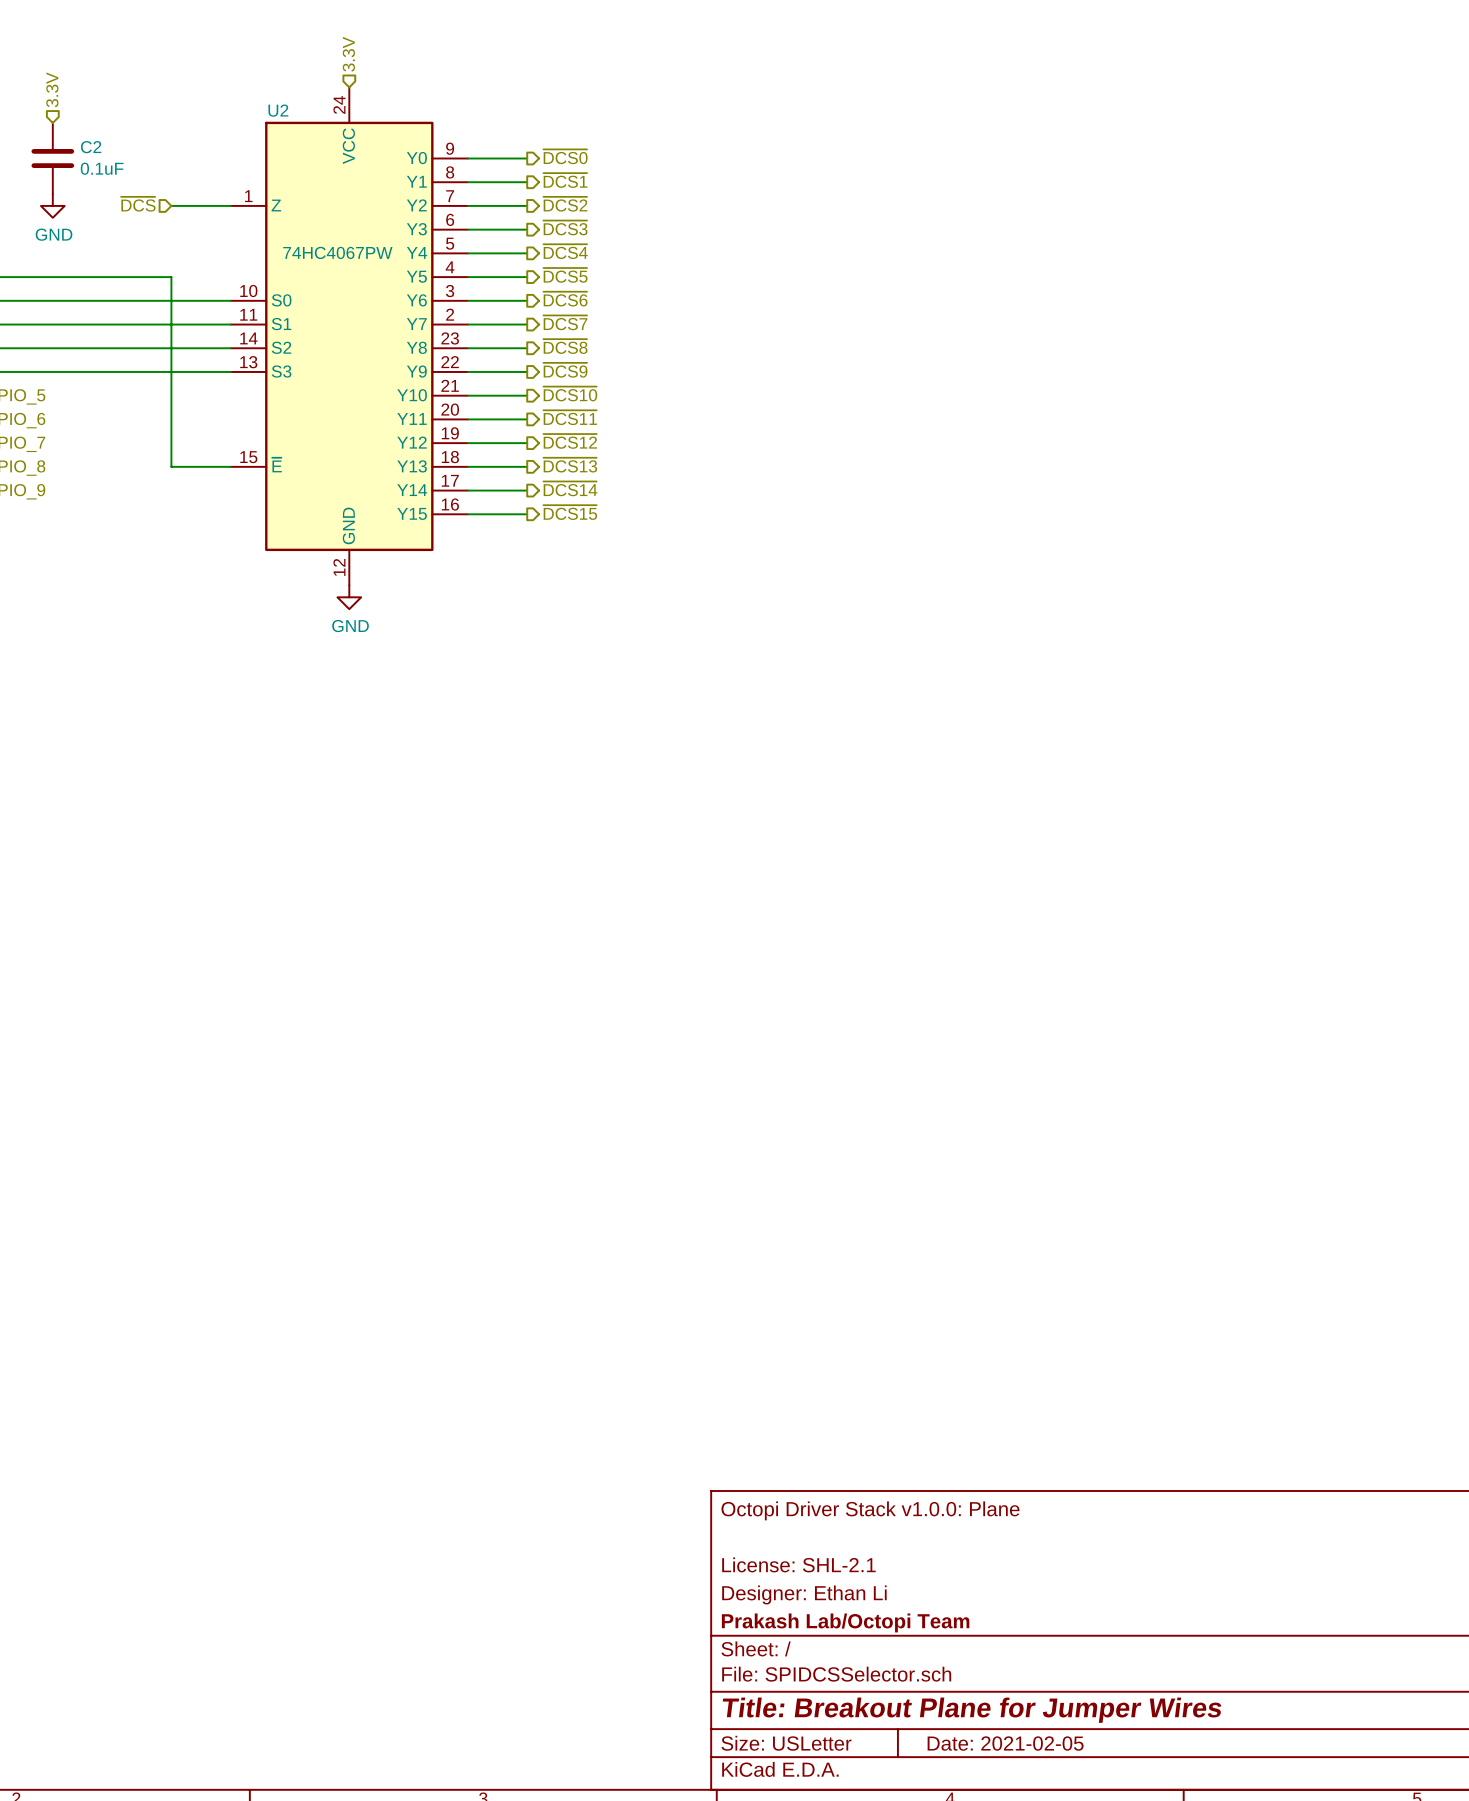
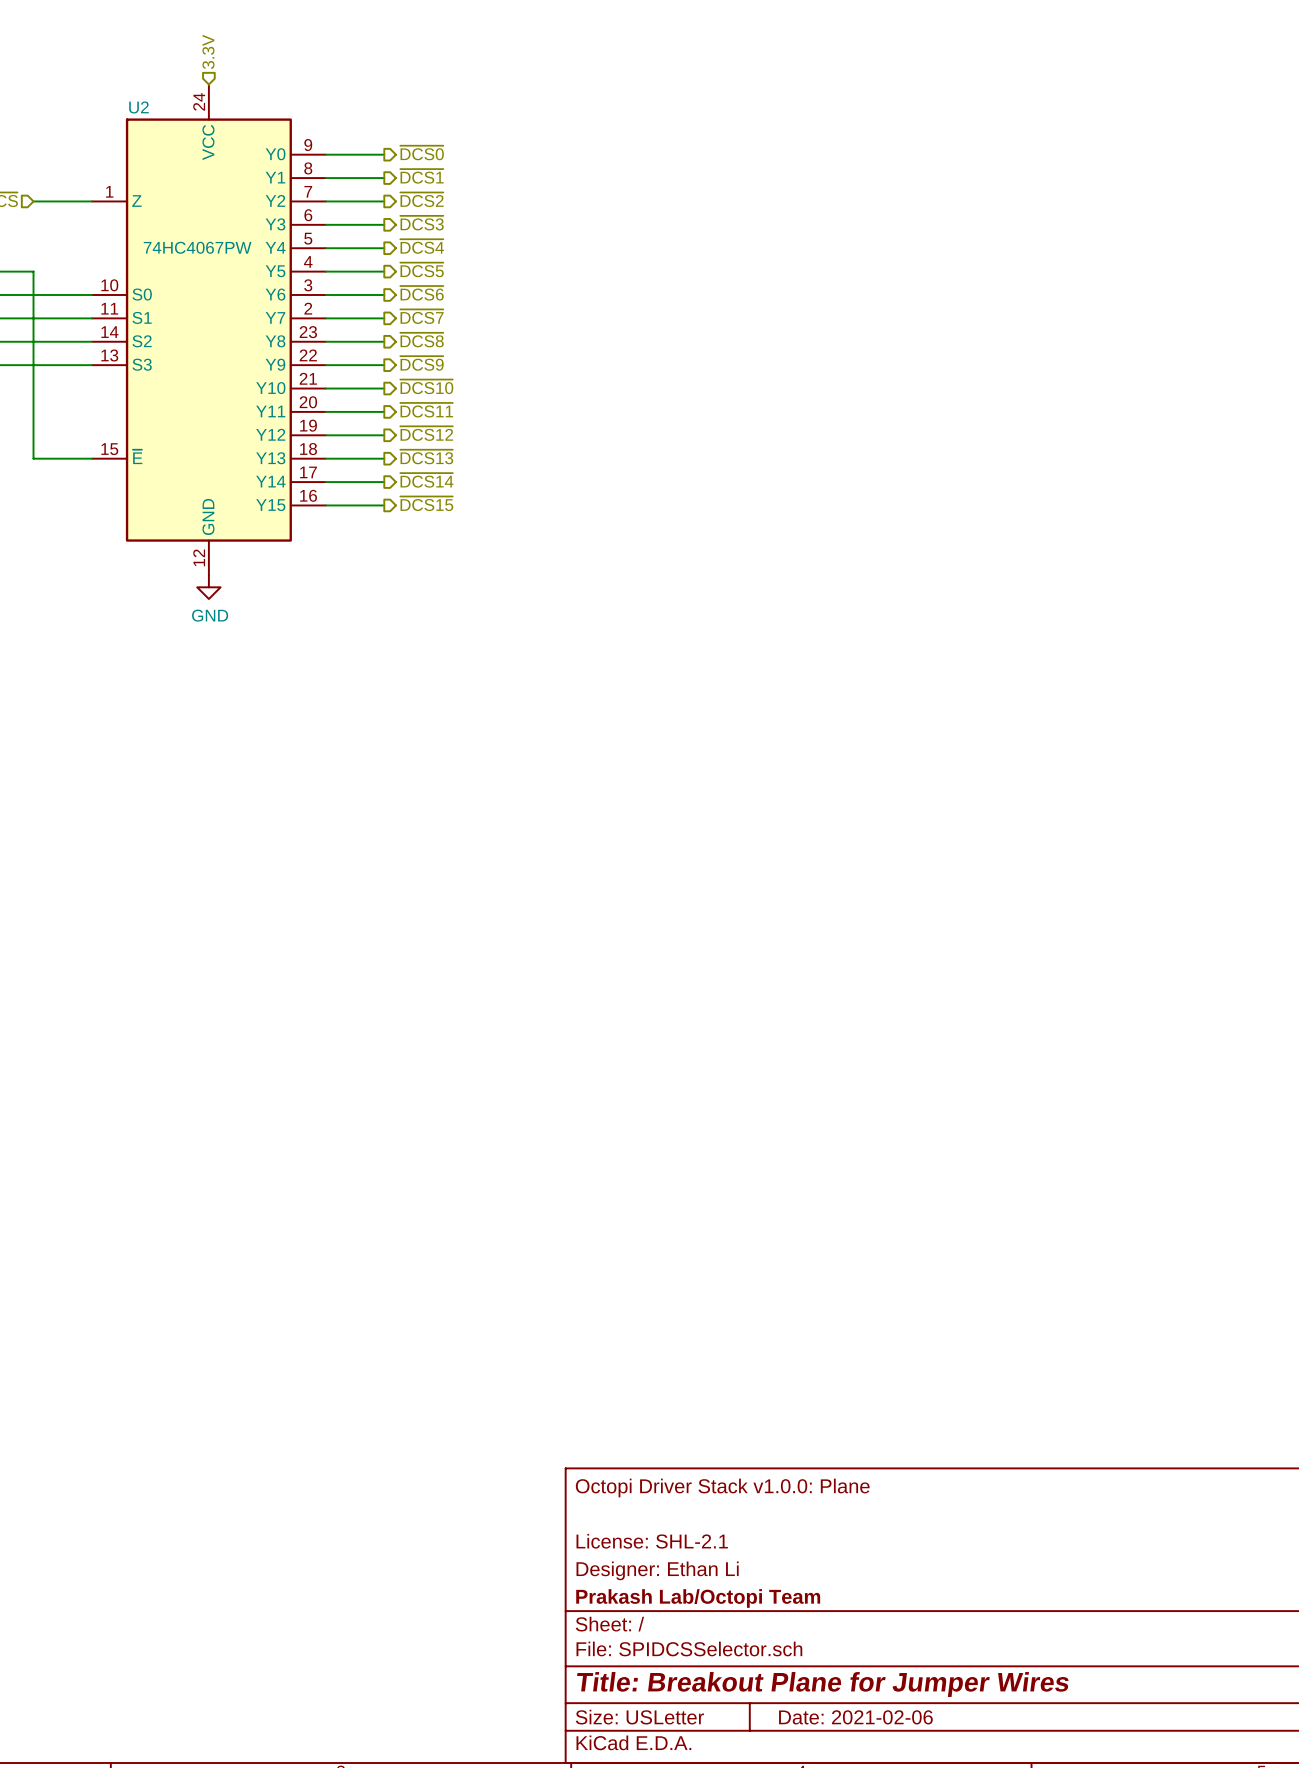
title block: Date: 2021-02-05 (1005, 1743) -> Date: 2021-02-06 (855, 1717)

